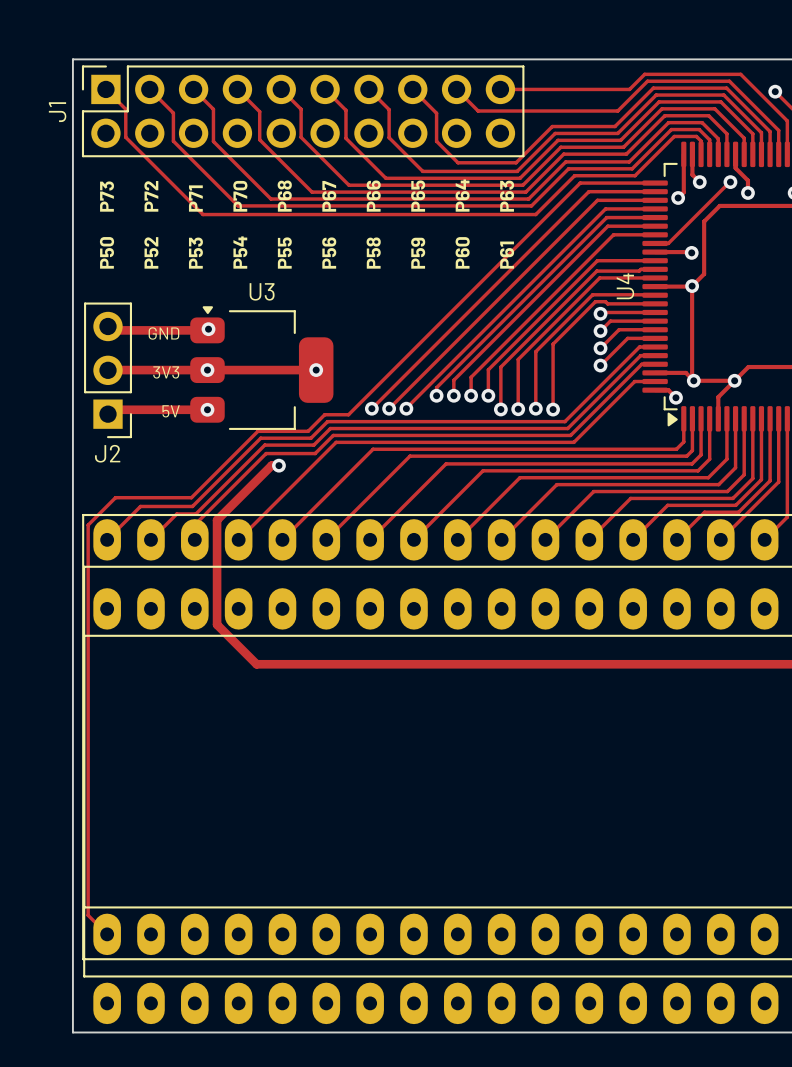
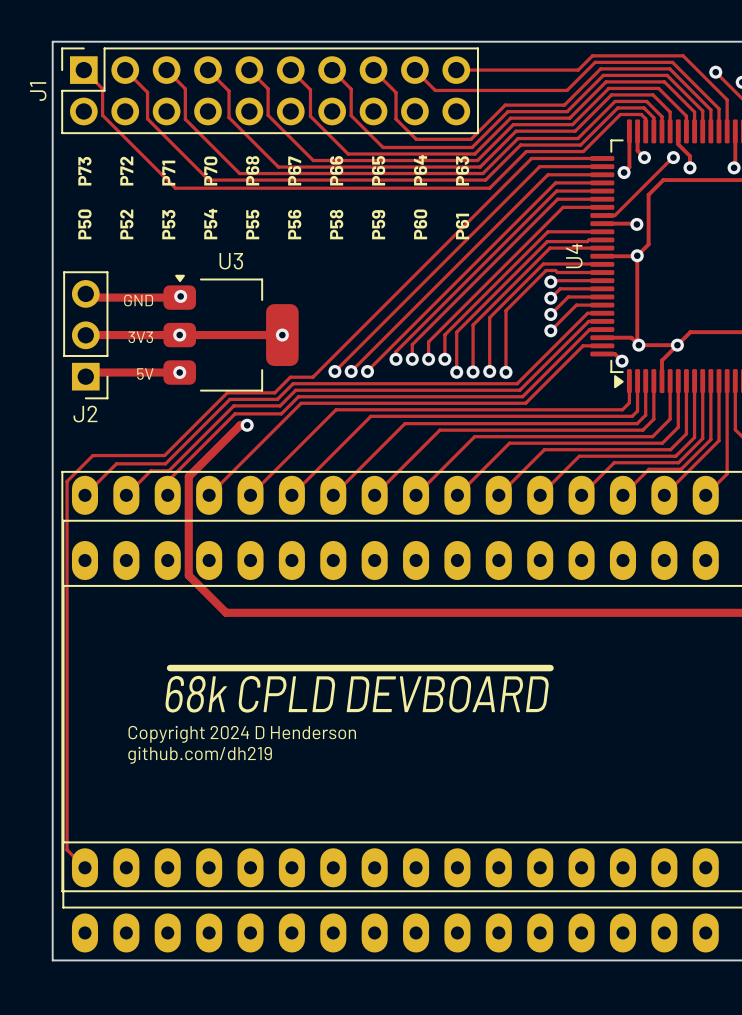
text: none -> ~{68k CPLD DEVBOARD} (357, 690)
text: none -> Copyright 2024 D Henderson (242, 734)
text: none -> github.com/dh219 (200, 755)

